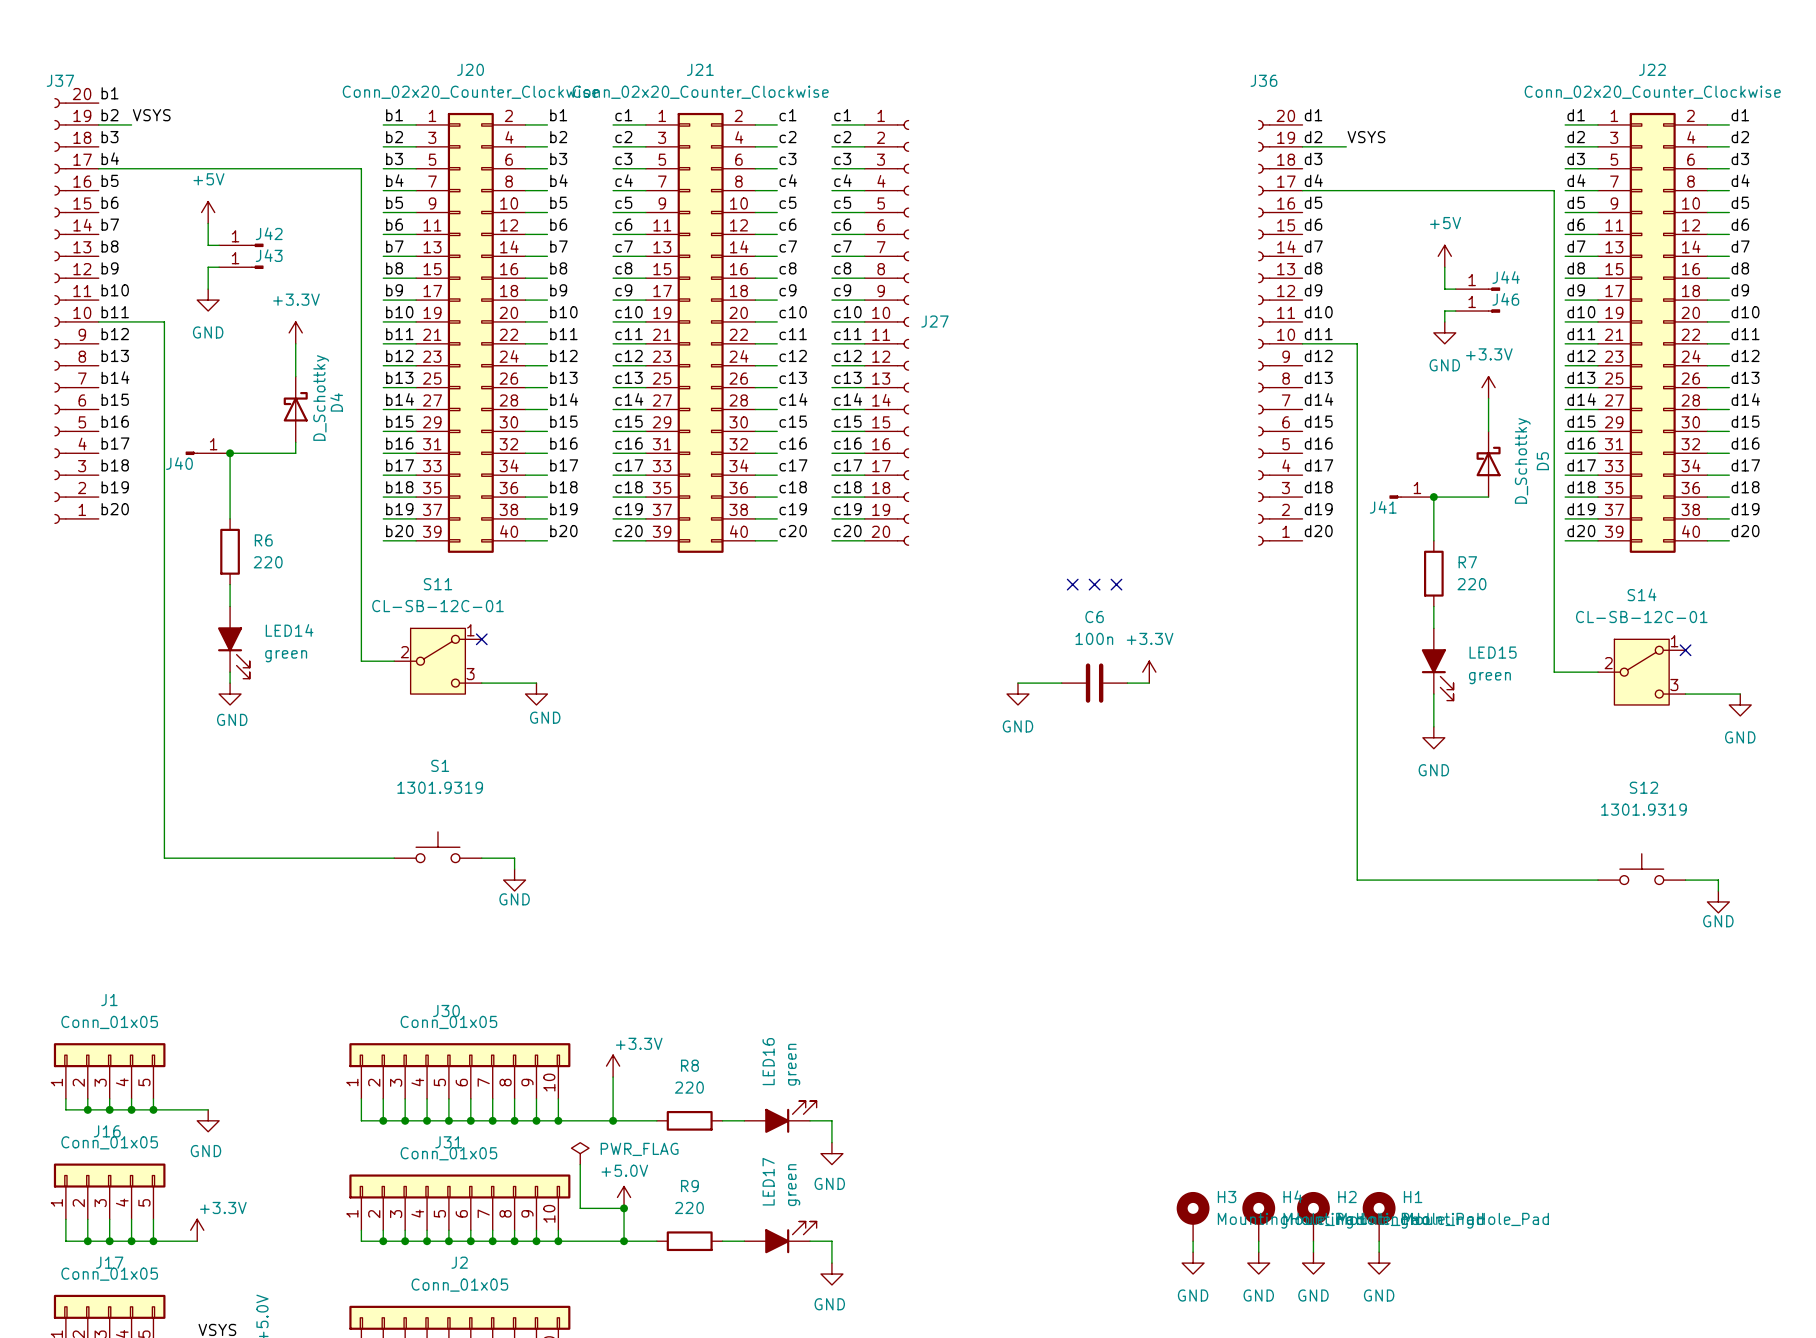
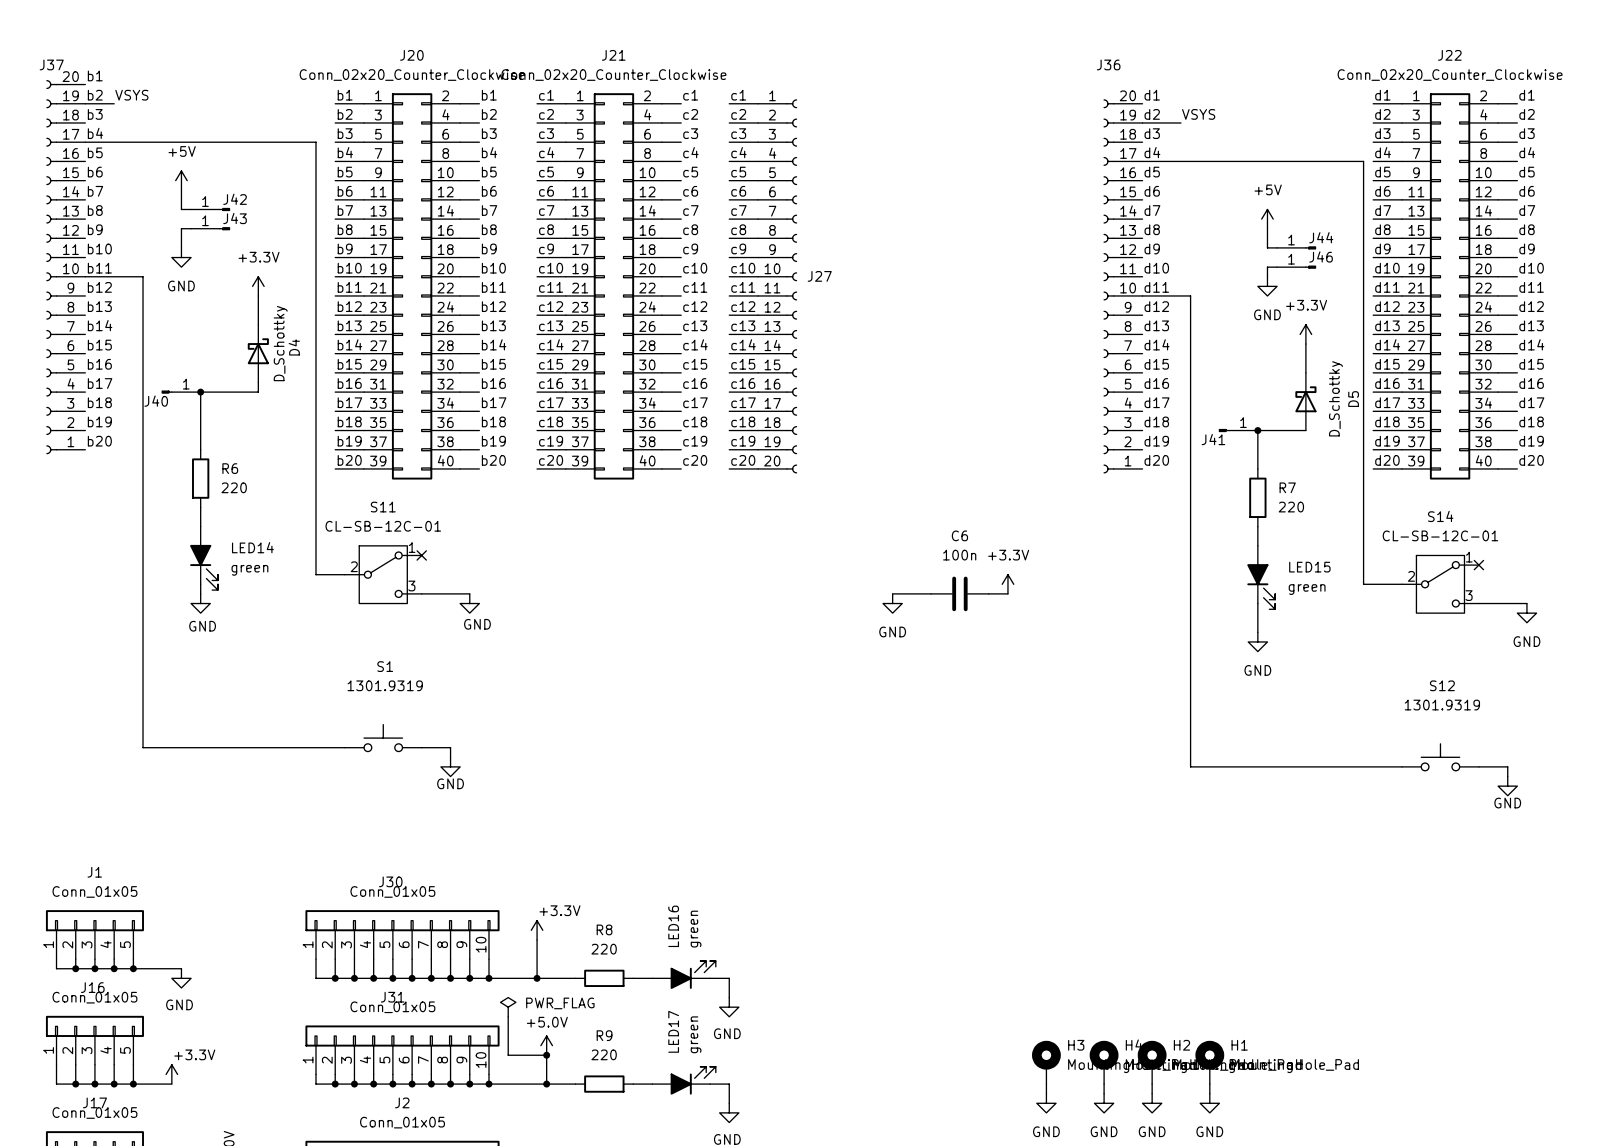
no-connect mark: (1072, 584) -> none
no-connect mark: (1094, 584) -> none
no-connect mark: (1116, 584) -> none

